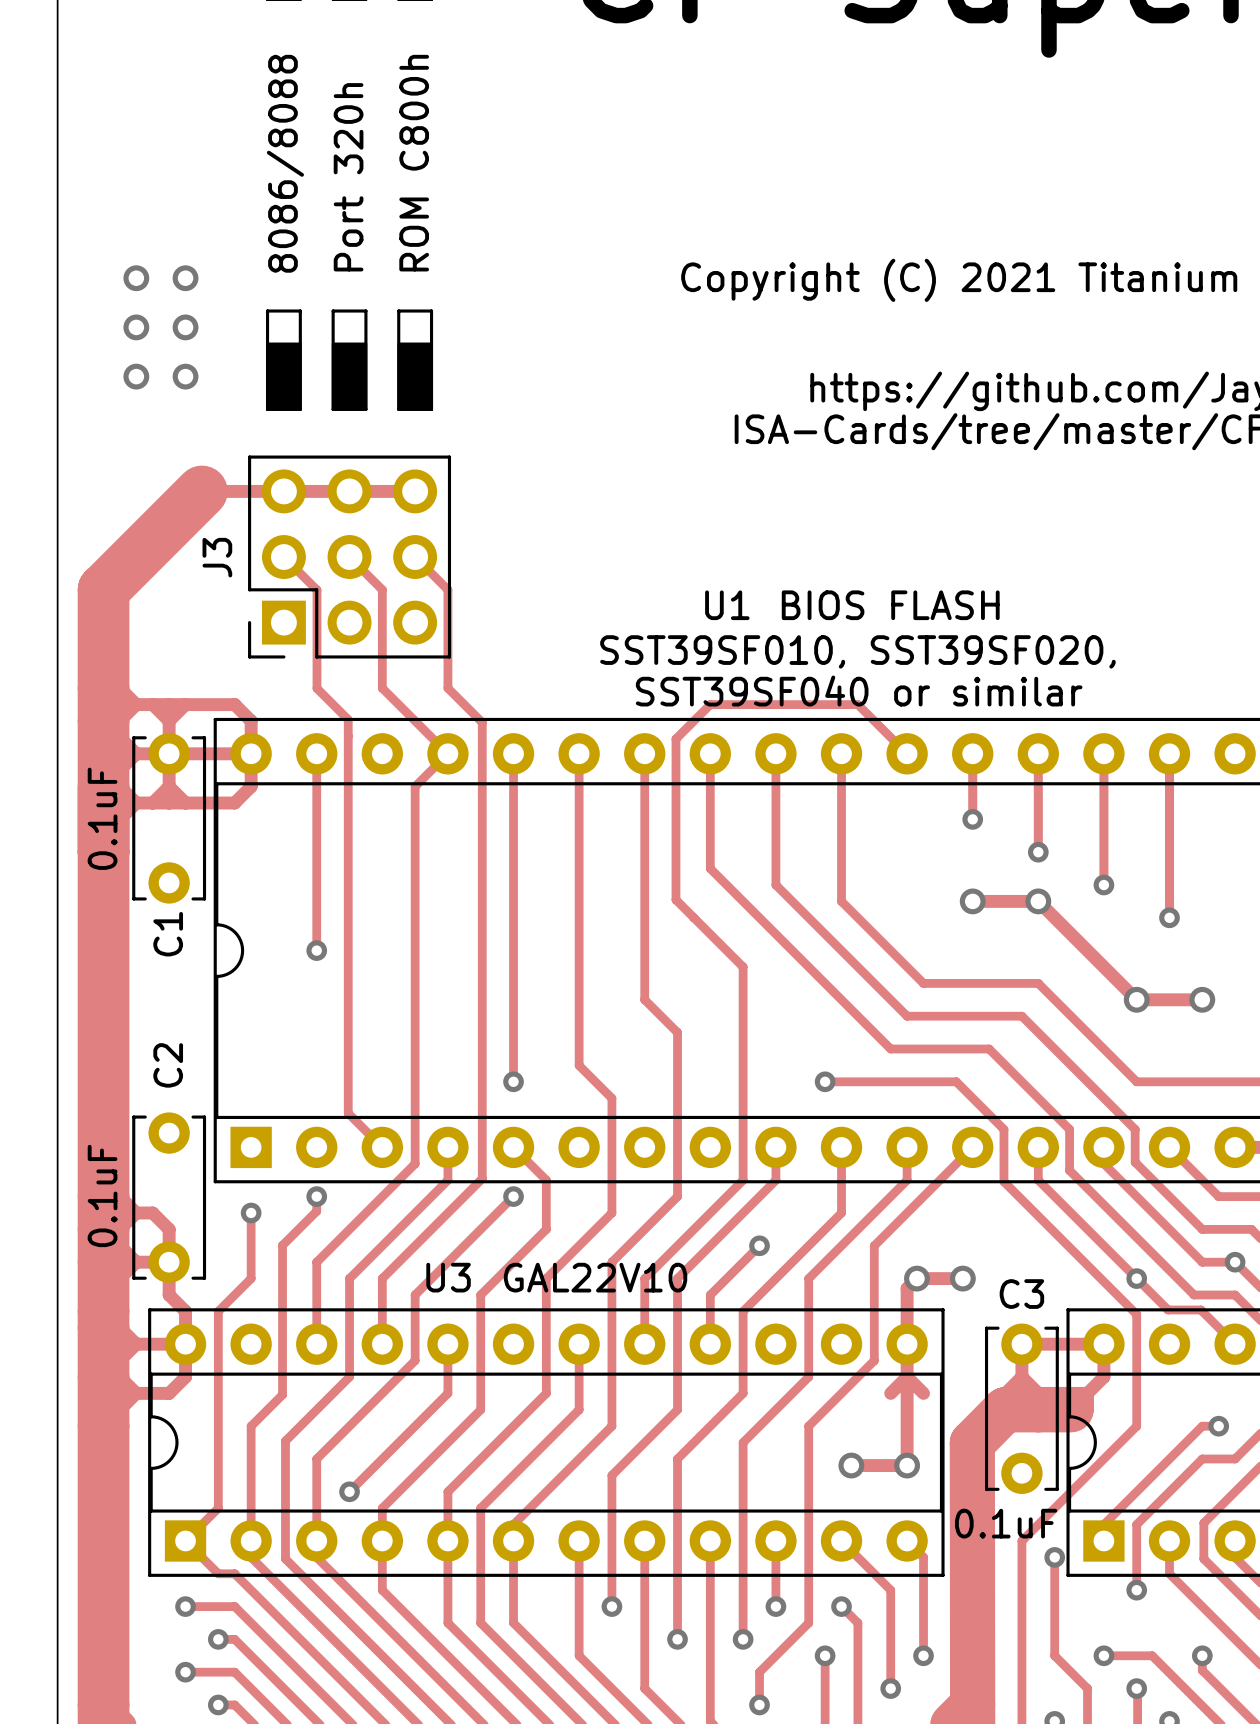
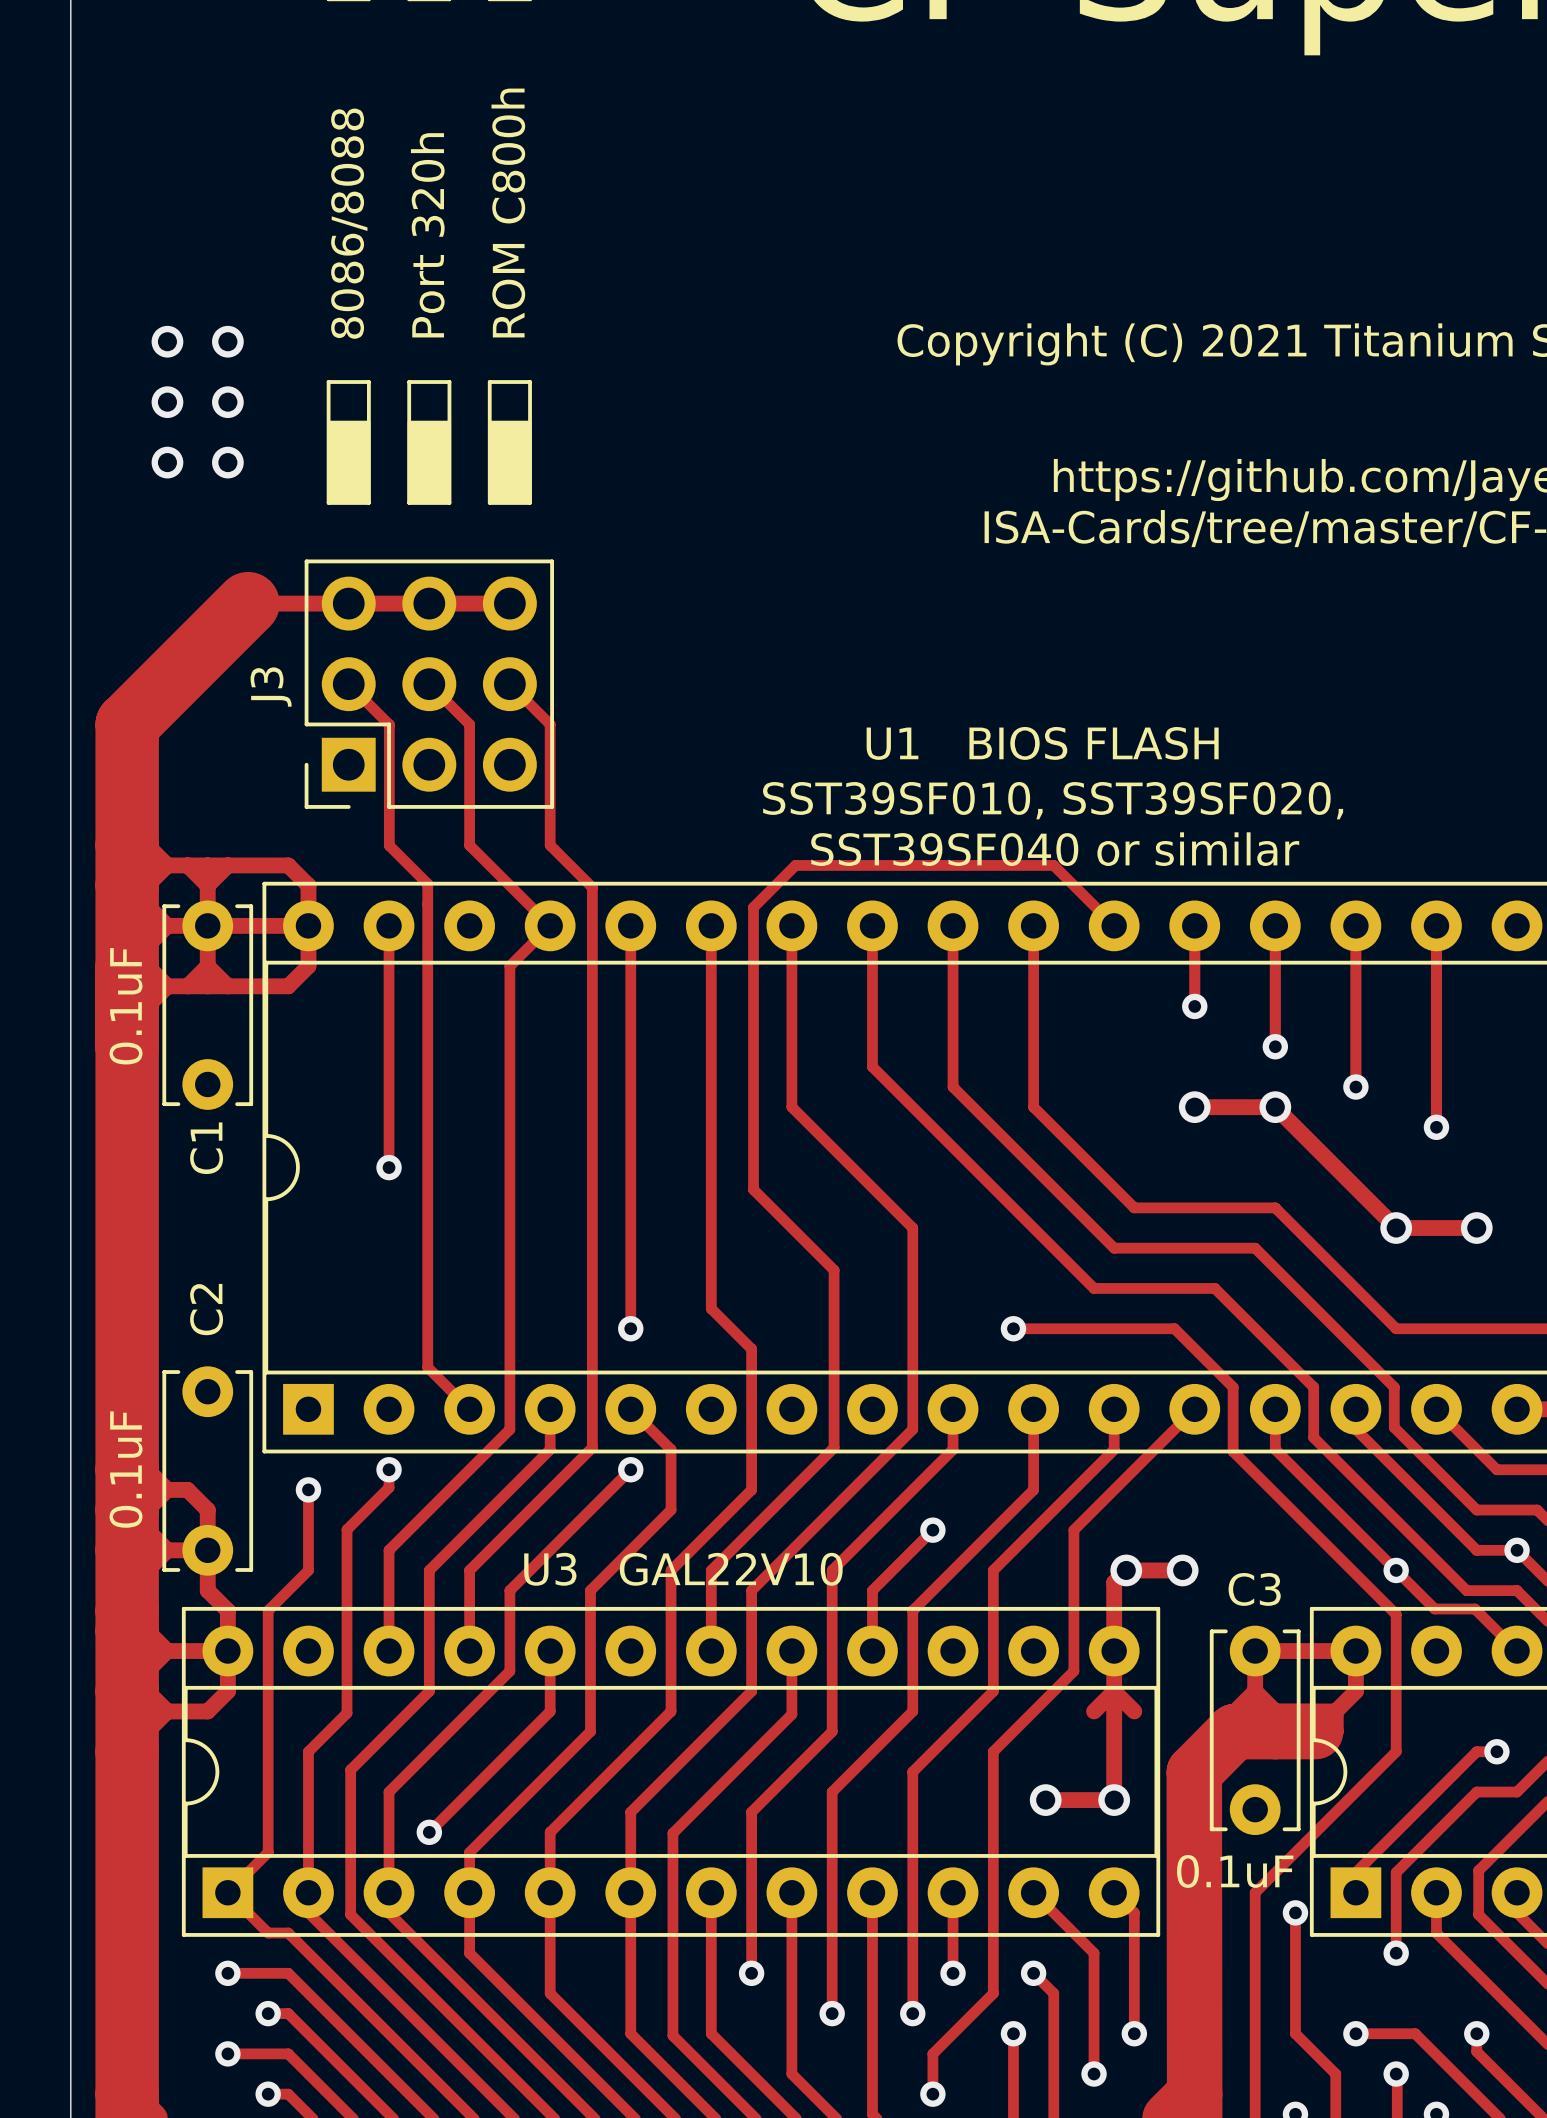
track: (710, 704) (675, 738) (675, 899) (743, 967) (743, 999) -> (872, 865) (795, 865) (753, 907) (753, 1189) (791, 1228)
track: (644, 901) (644, 999) -> (791, 1107) (912, 1228)
track: (677, 1032) (677, 1196) (611, 1262) (611, 1294) -> (832, 1268) (834, 1270) (834, 1447) (711, 1570) (711, 1651)
track: (743, 1163) (743, 1180) (644, 1278) (644, 1344) -> (912, 1429) (751, 1590)
track: (579, 1344) (579, 1409) -> (751, 1691) (711, 1731)
track: none -> (791, 1651) (791, 1714) (672, 1833) (672, 2035)
track: (611, 1376) (611, 1426) (513, 1524) -> none
track: (513, 1475) (480, 1508) (480, 1622) (513, 1655) -> (630, 1812) (630, 1872)
track: (513, 1622) (547, 1657) -> (630, 1993) (630, 2033)

